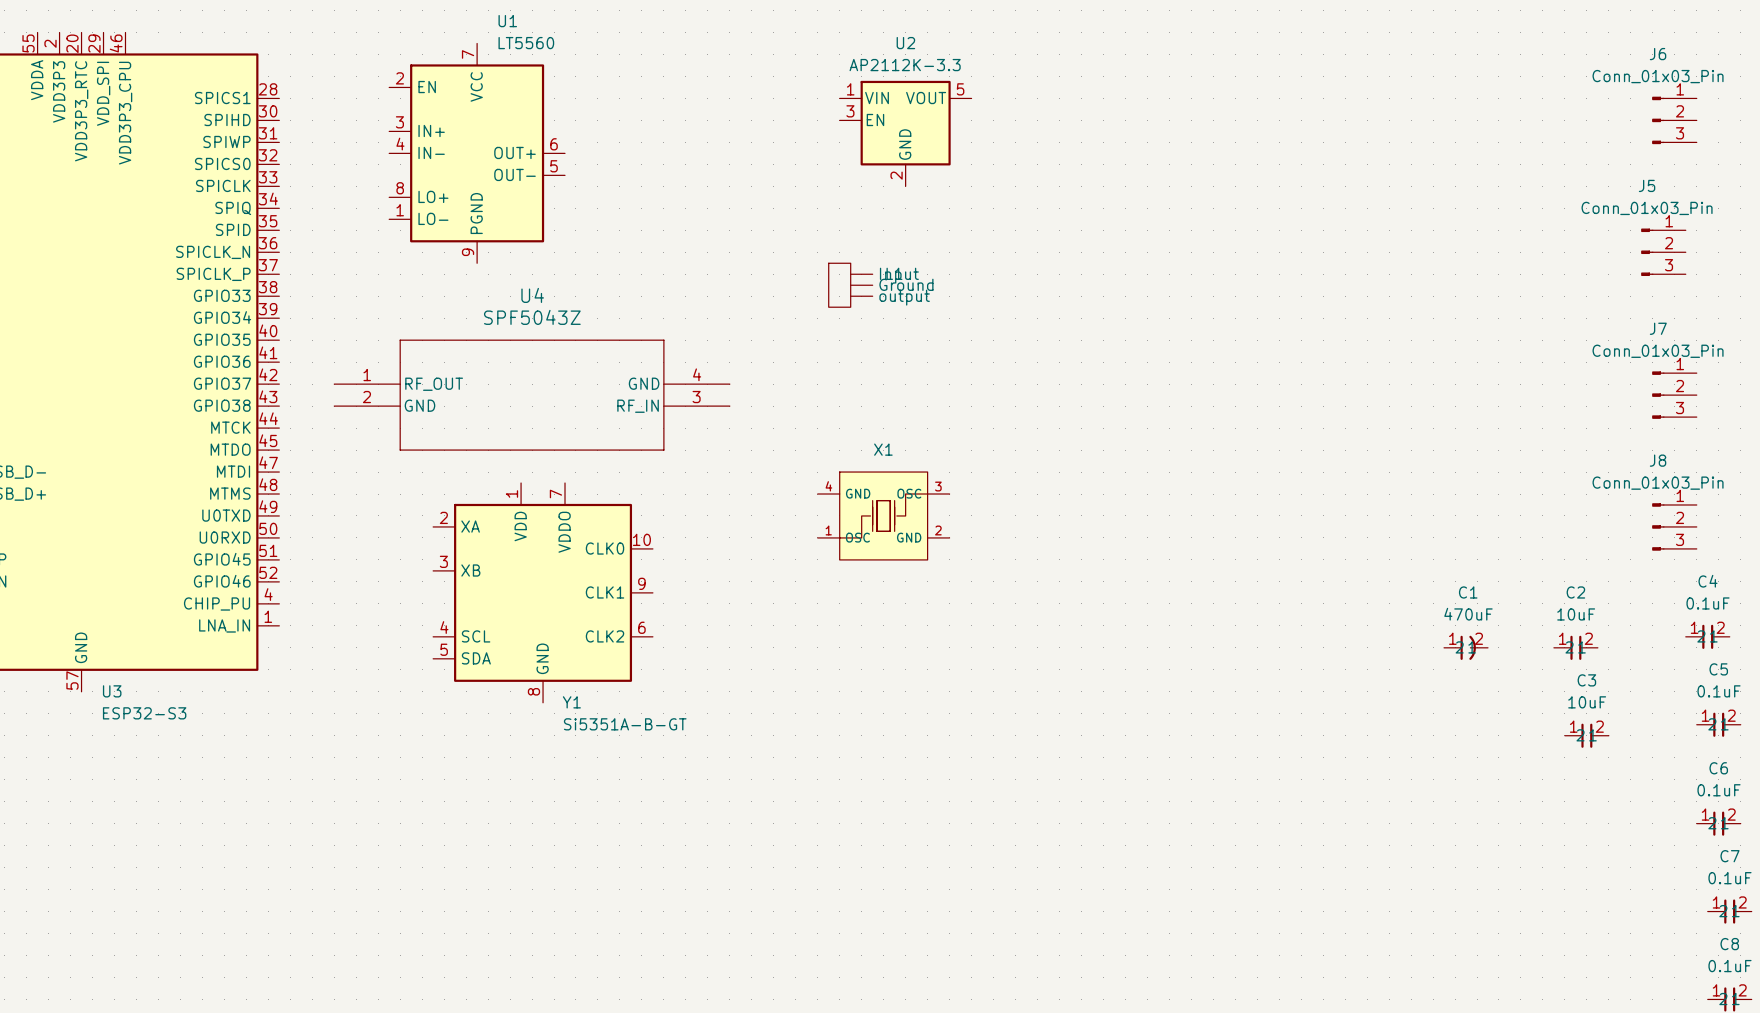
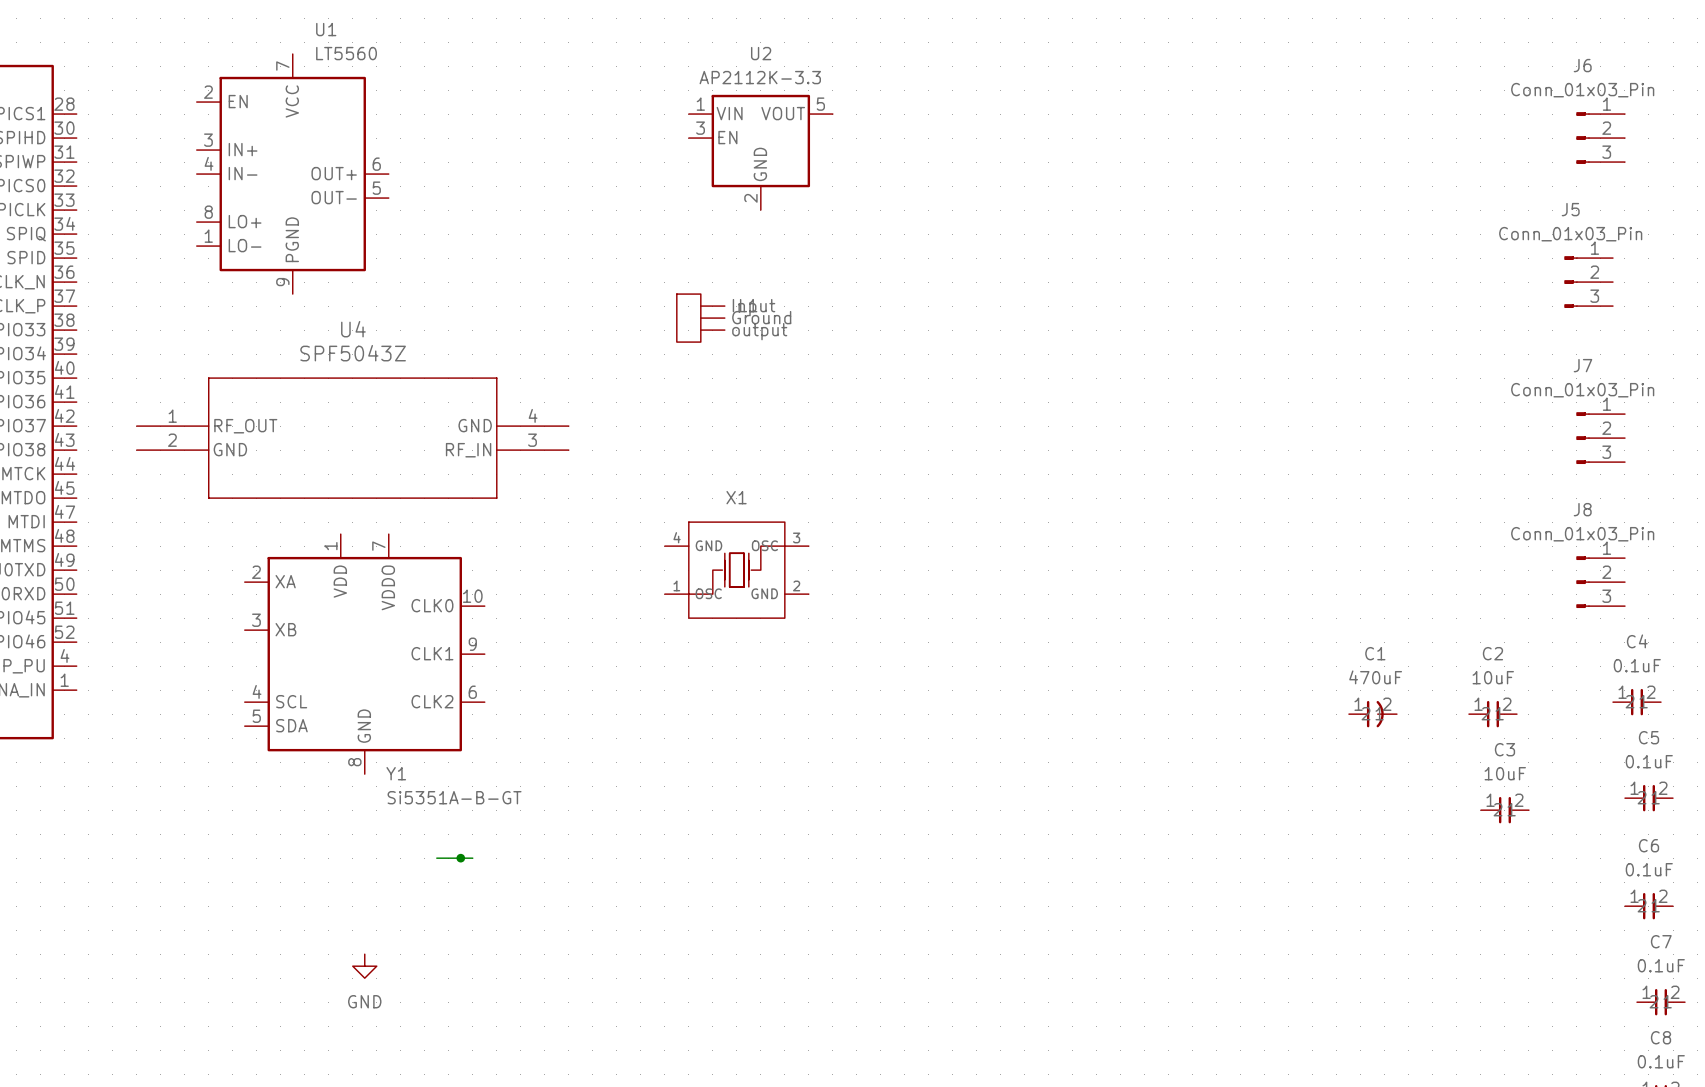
wire: none -> (436, 858) (472, 858)
junction: none -> (460, 858)
power symbol: none -> GND (364, 966)

